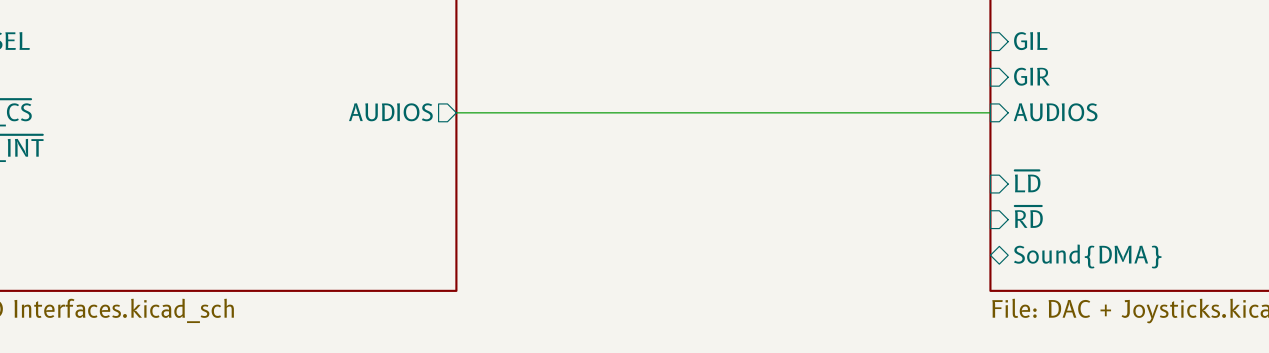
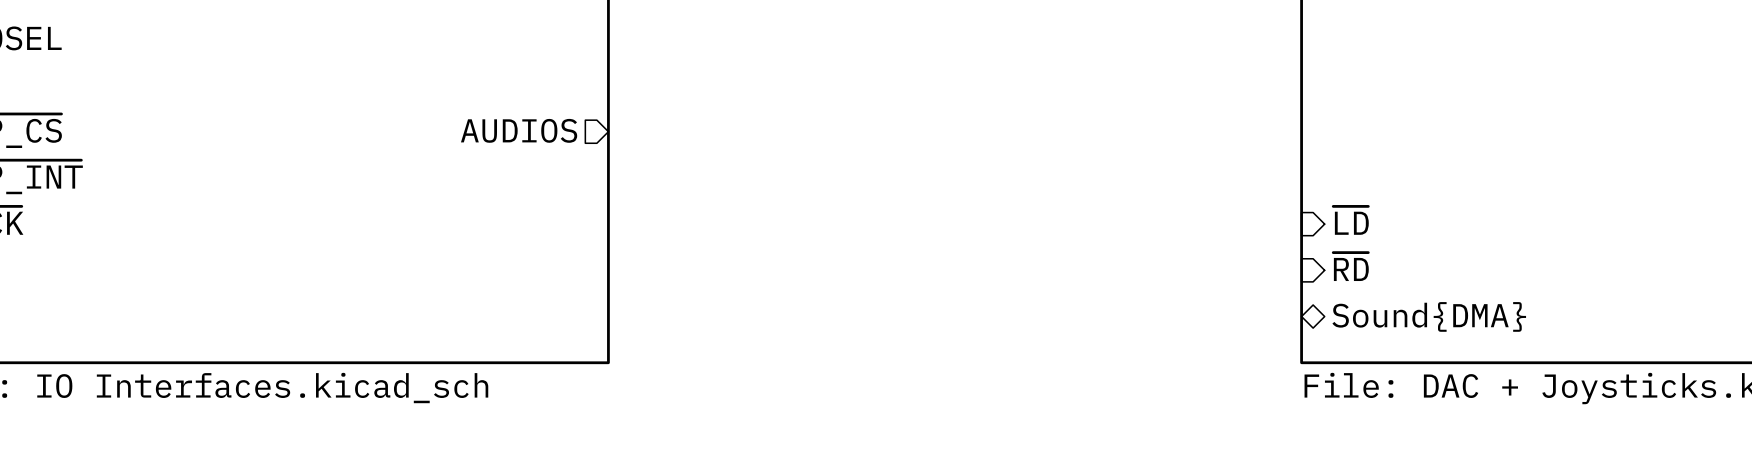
sheet pin: GIL (1030, 41) -> none
sheet pin: GIR (1031, 76) -> none
wire: (456, 112) (990, 112) -> none
sheet pin: AUDIOS (1055, 112) -> none

